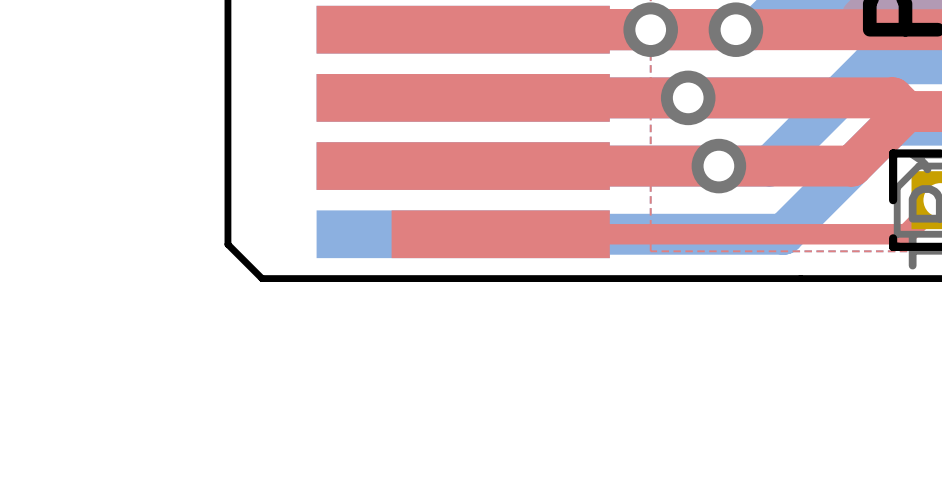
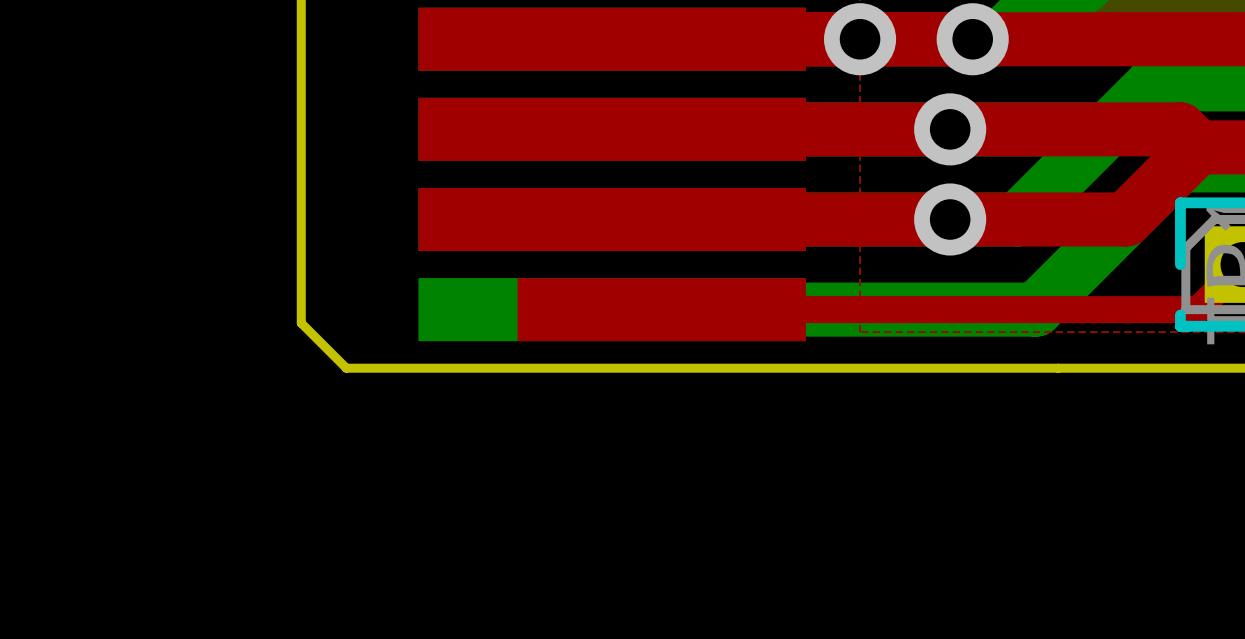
via position: (688, 97) -> (950, 129)

